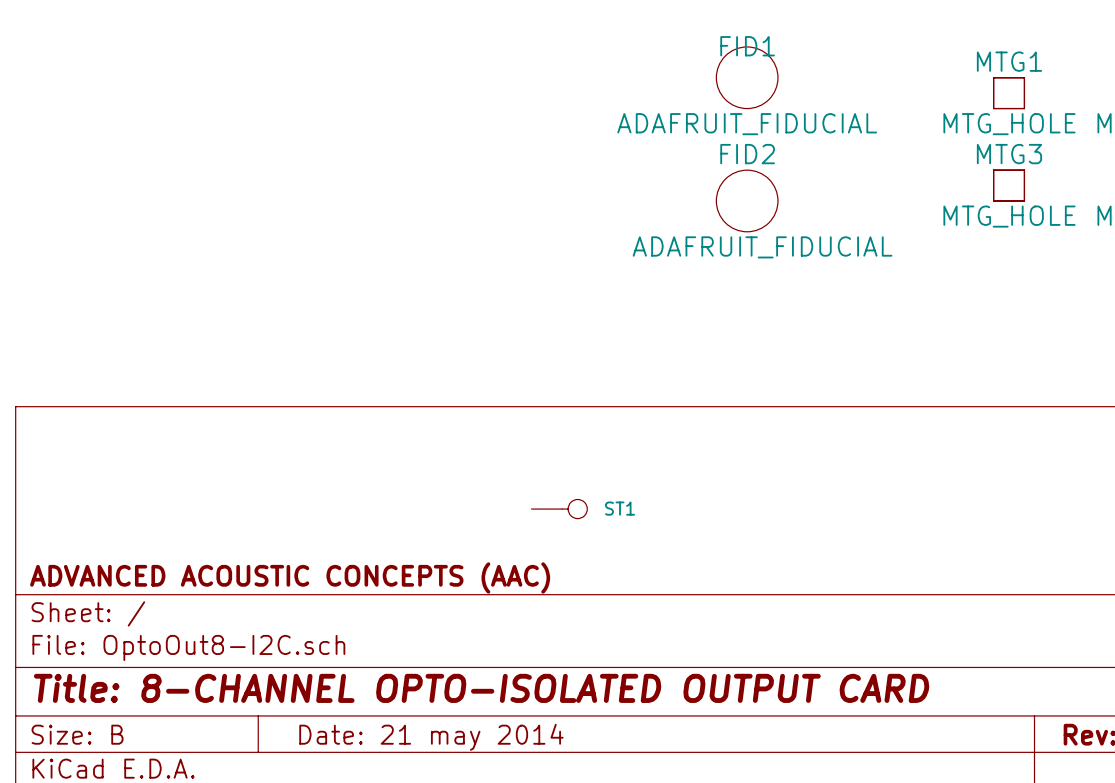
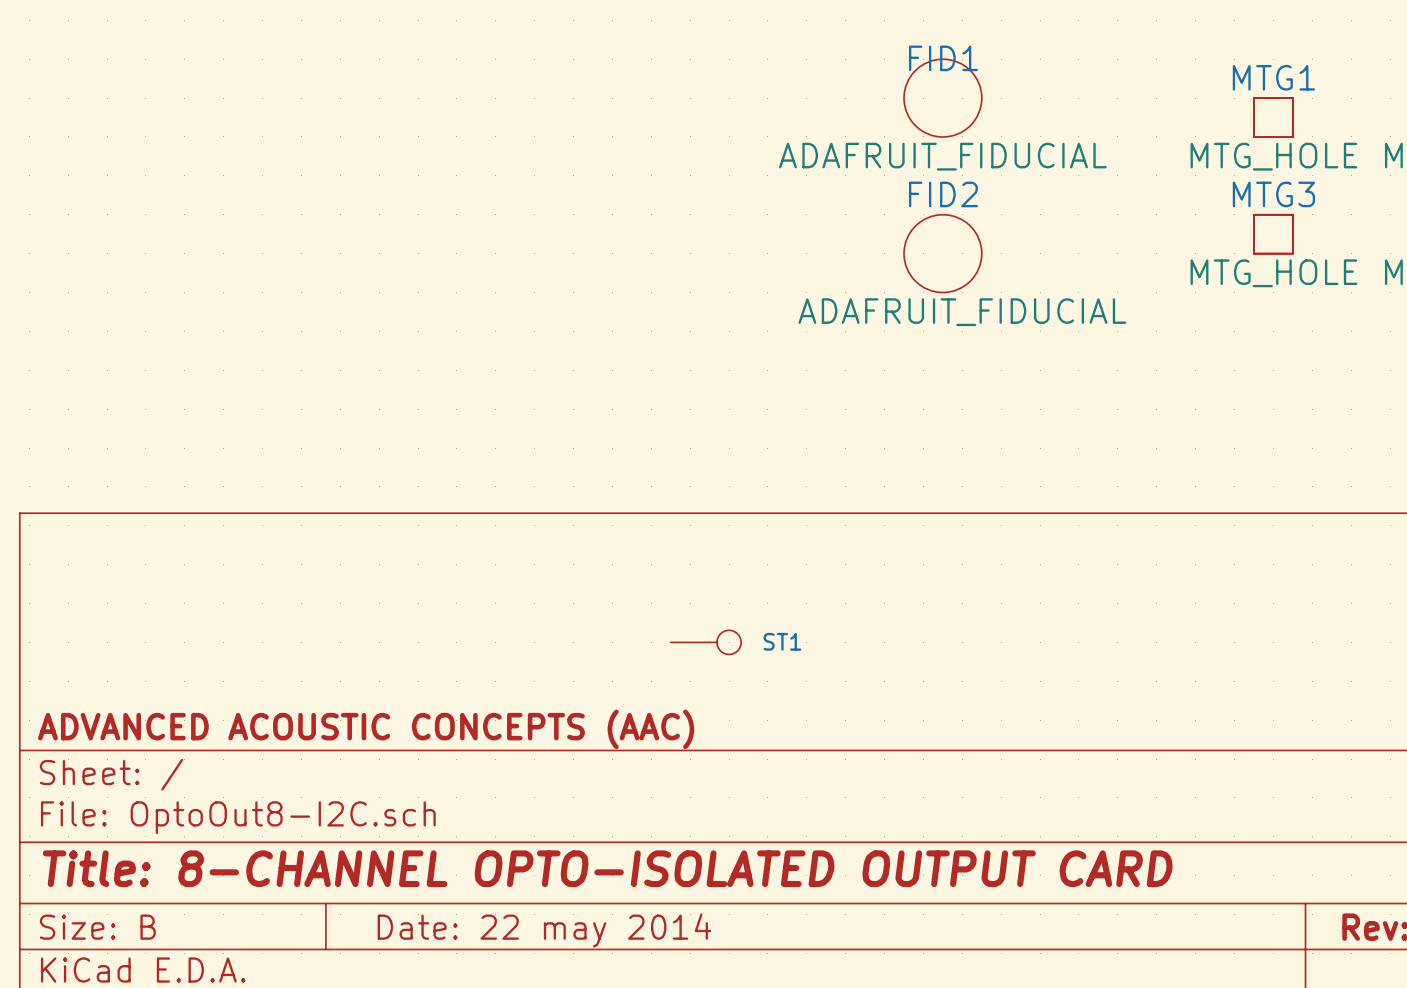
title block: Date: 21 may 2014 (431, 737) -> Date: 22 may 2014 (544, 930)

